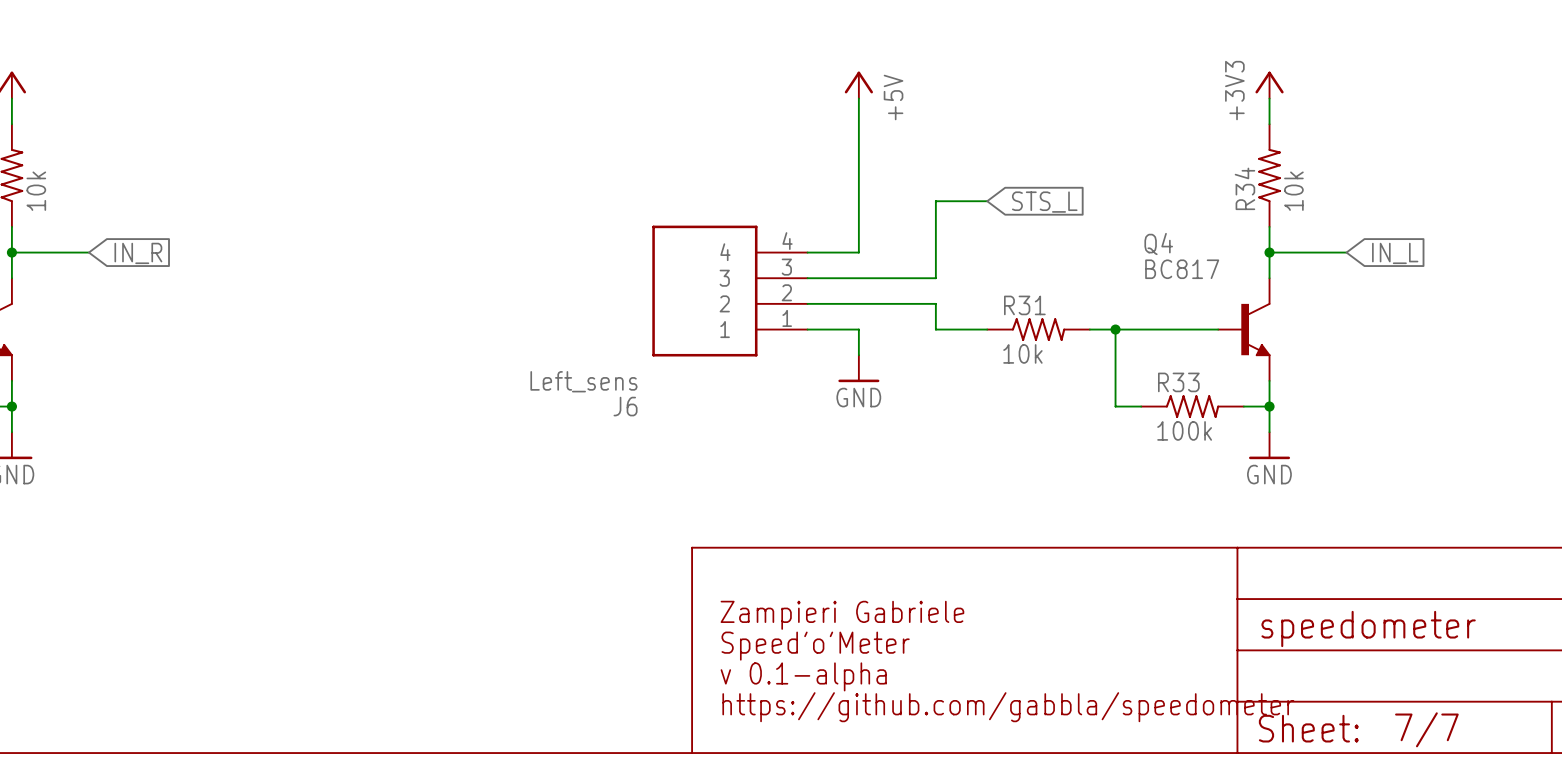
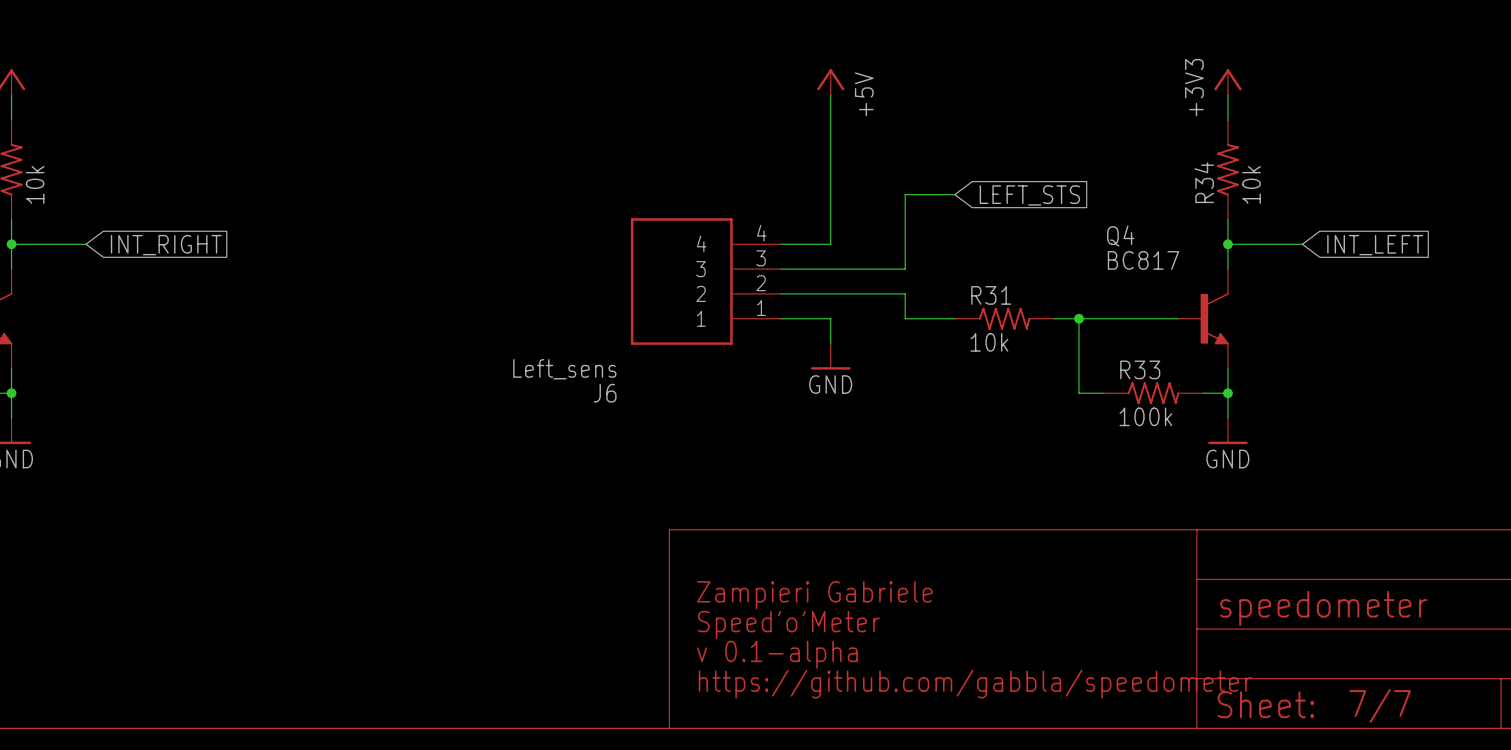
global label: STS_L (1044, 202) -> LEFT_STS (1029, 195)
global label: IN_R (138, 253) -> INT_RIGHT (166, 245)
global label: IN_L (1395, 253) -> INT_LEFT (1375, 245)

